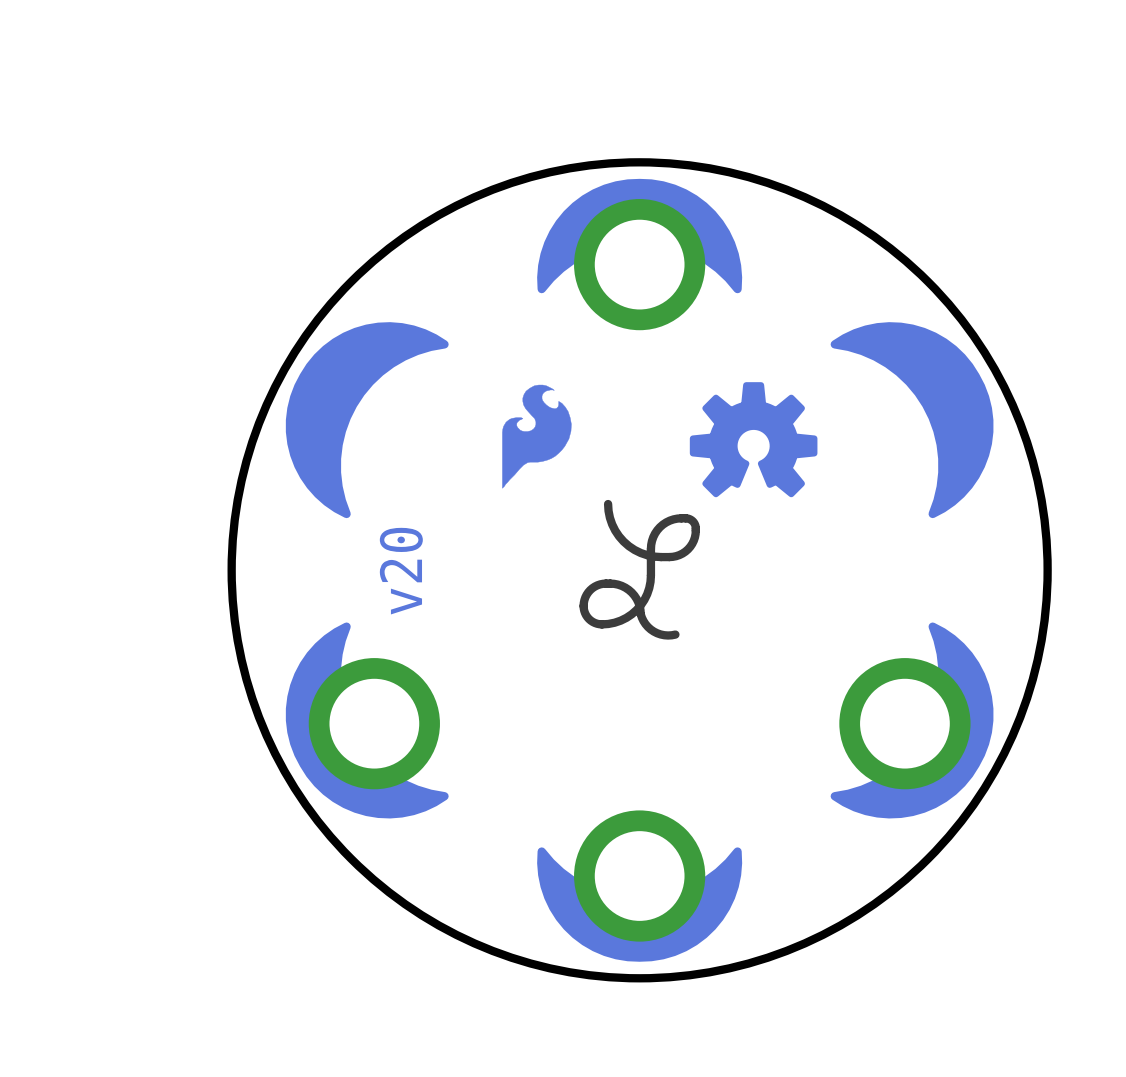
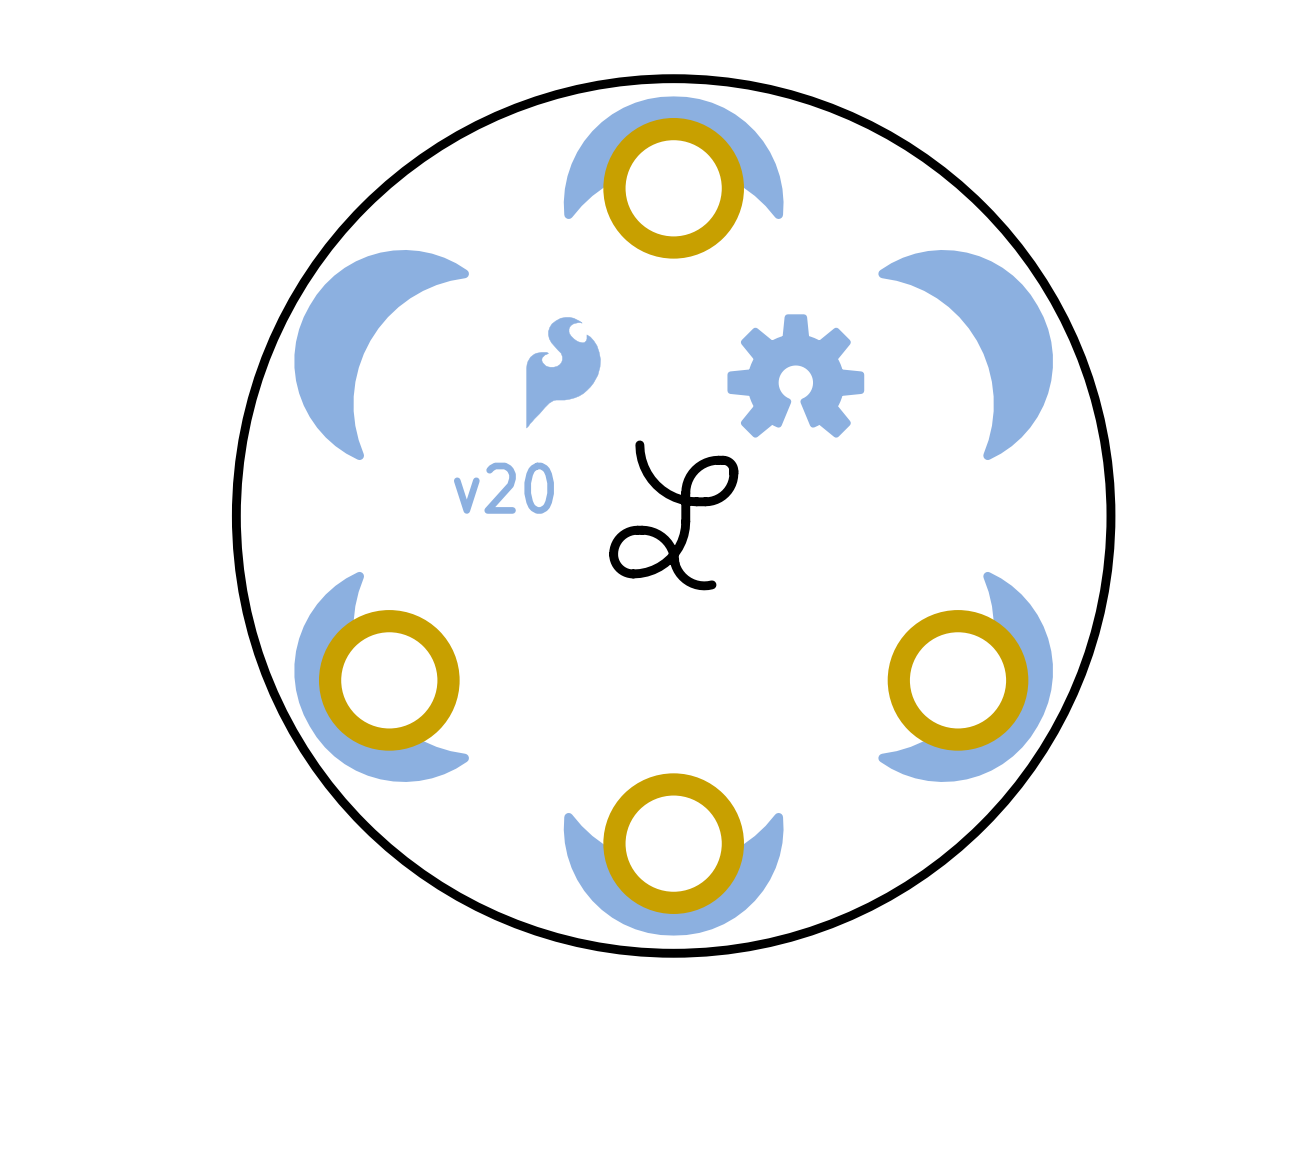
text rotation: 0° (401, 571) -> 90° clockwise (503, 488)

